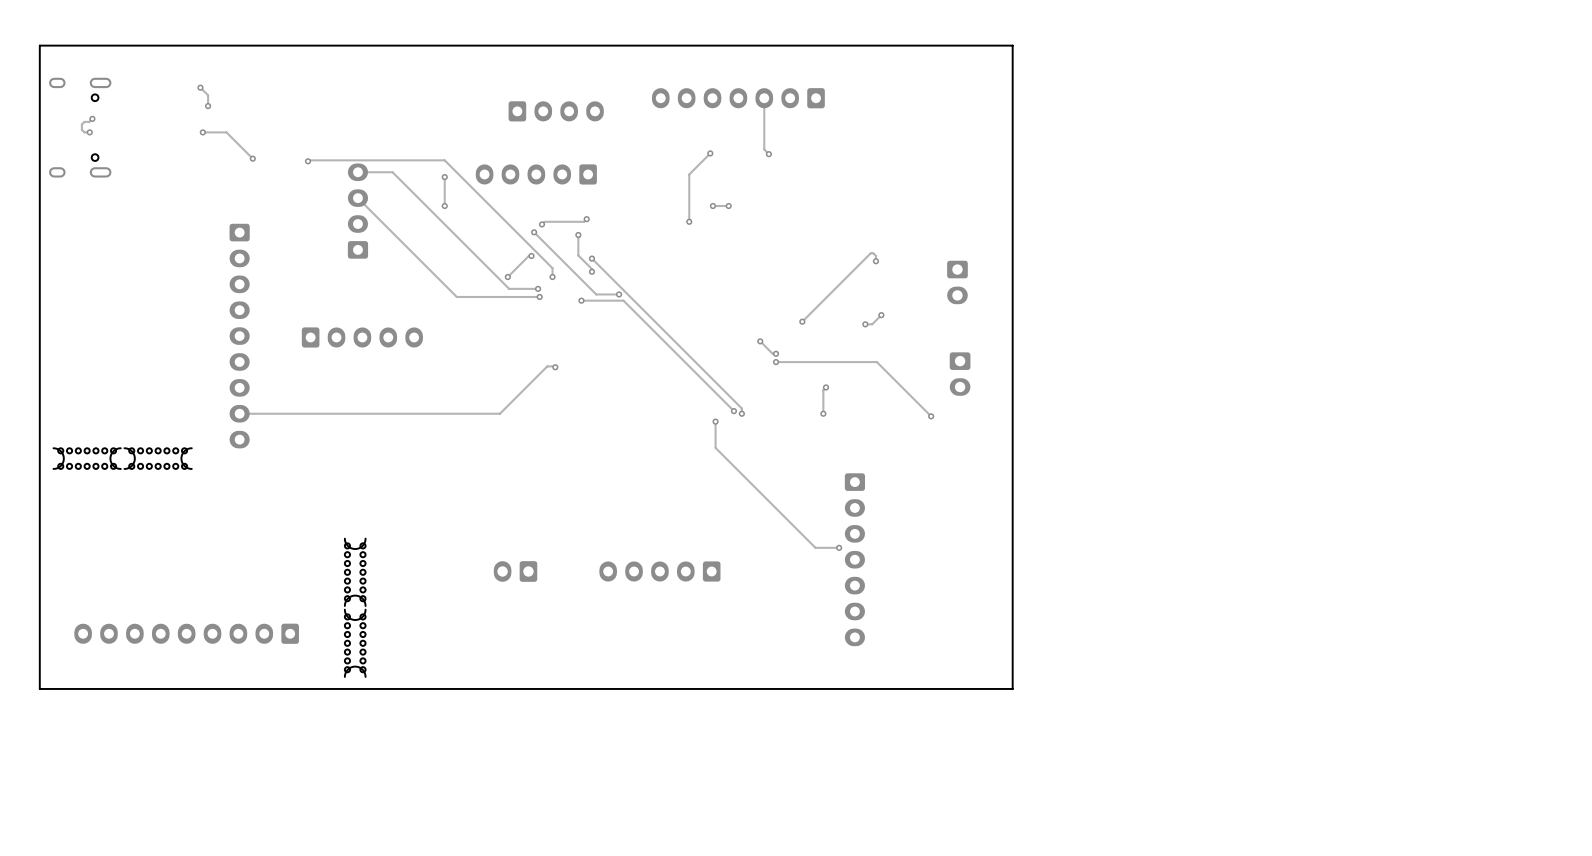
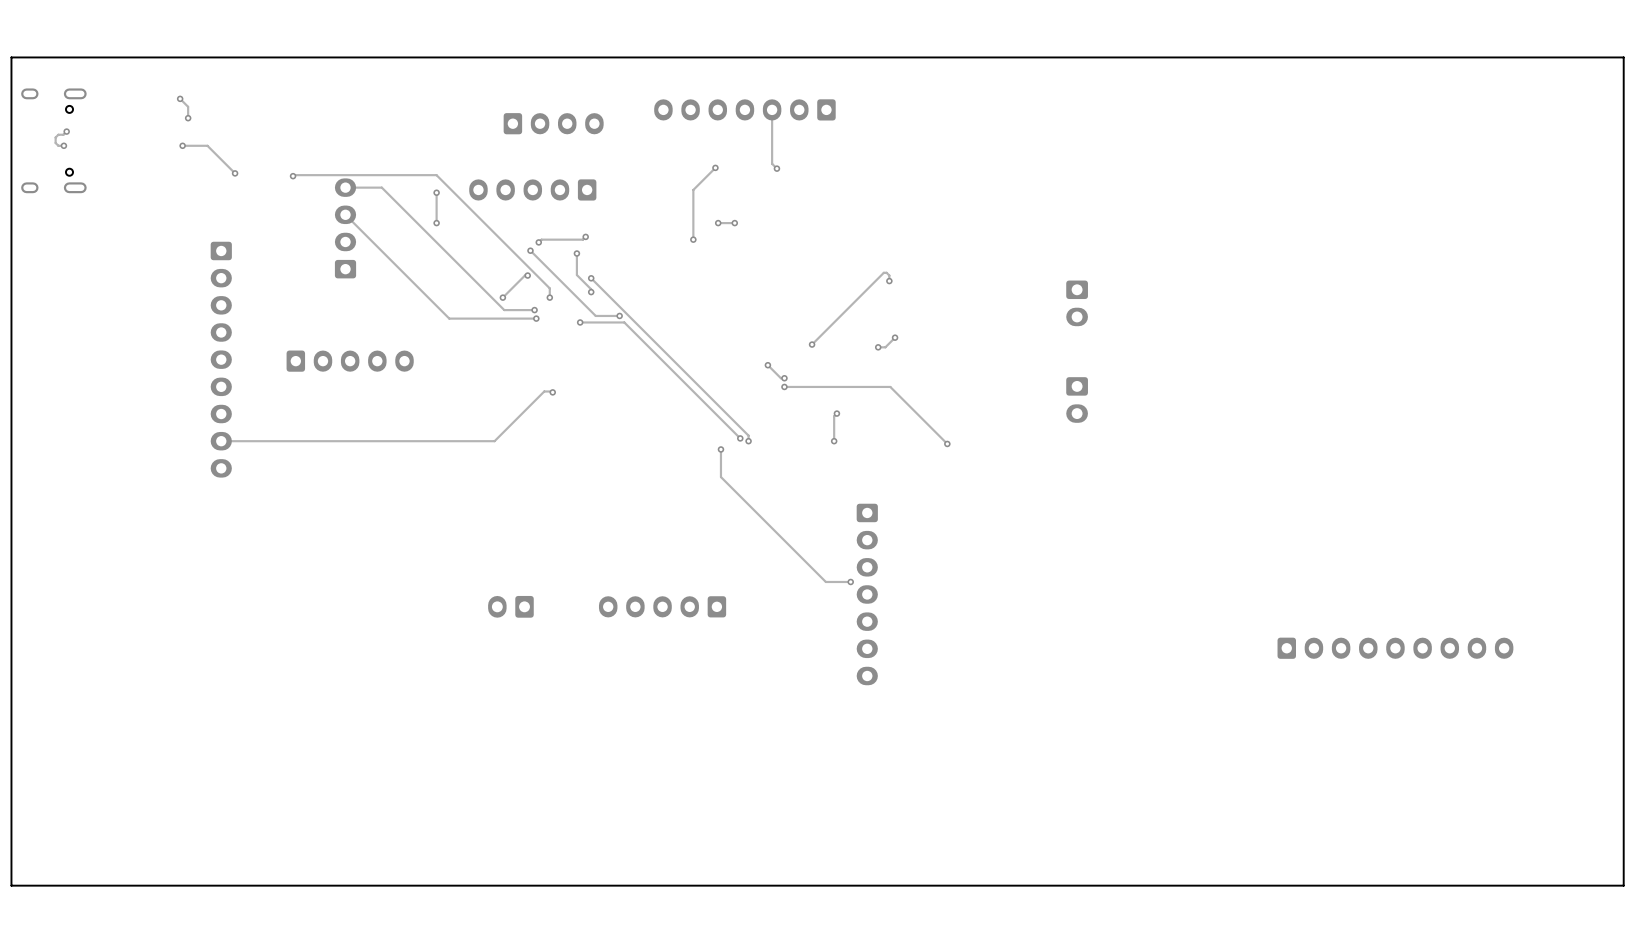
board edge: (39, 48) (39, 45) (1012, 45) (1012, 688) (39, 688) -> (11, 57) (1623, 57) (1623, 885) (11, 885) (11, 730)
part: (957, 282) -> none
part: none -> (1077, 303)
part: (960, 374) -> none
part: none -> (1077, 399)
part: (87, 458) -> none
part: (158, 458) -> none
part: (355, 572) -> none
part: none -> (1395, 648)
part: (186, 633) -> none
part: (355, 643) -> none

